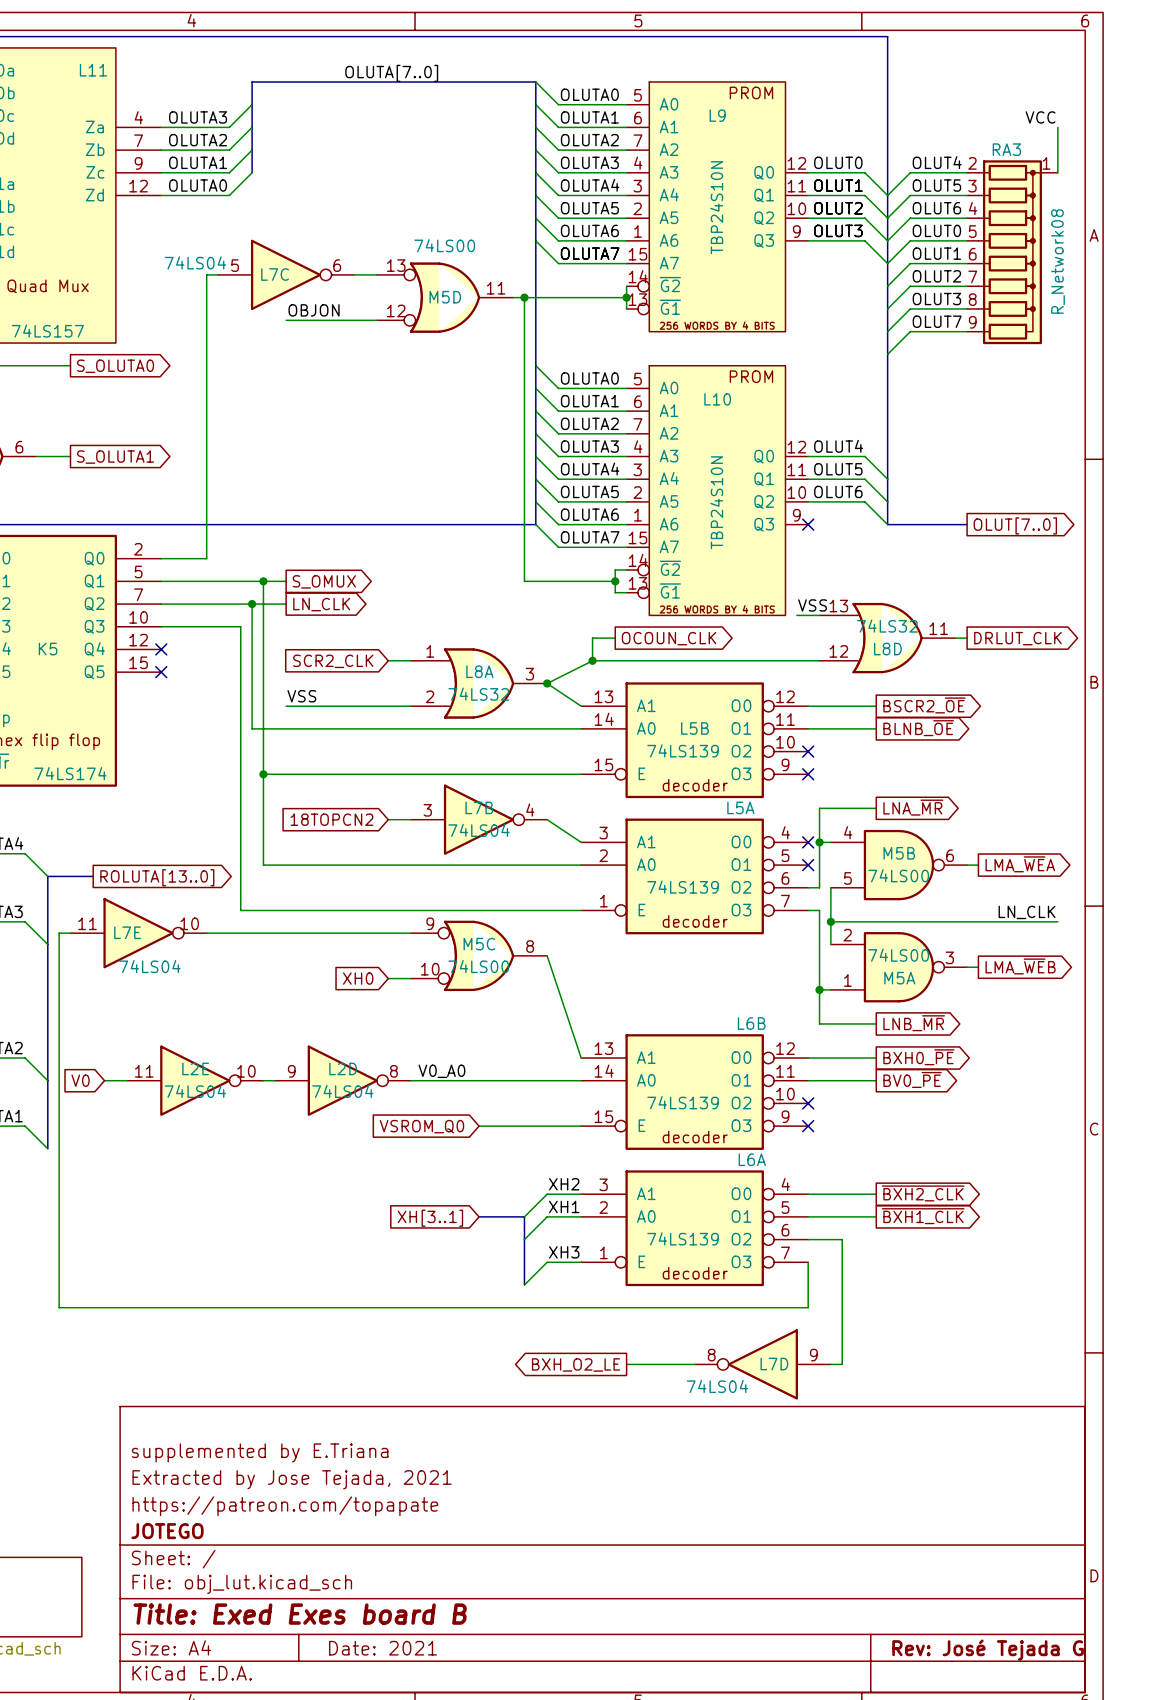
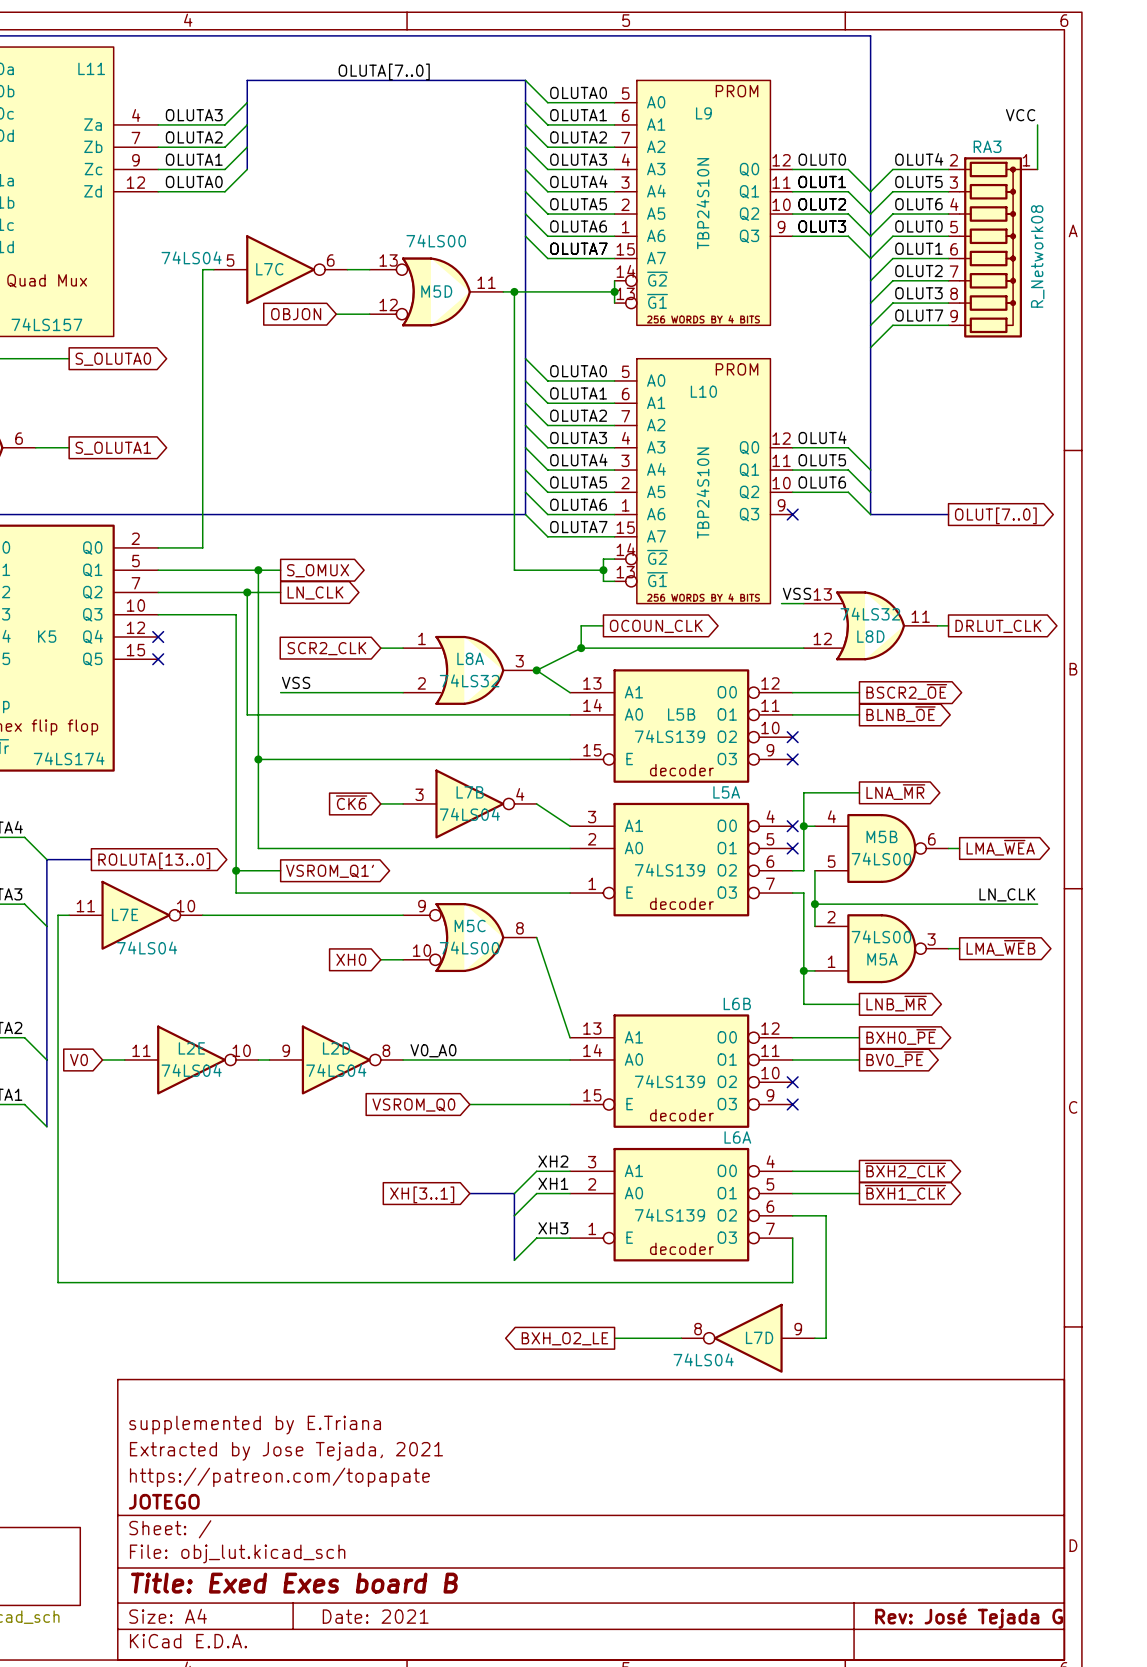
label: OBJON (314, 310) -> none
wire: (286, 320) (342, 320) -> none
global label: none -> OBJON (296, 314)
global label: 18TOPCN2 (331, 819) -> ~{CK6} (351, 802)
wire: none -> (236, 870) (280, 870)
junction: none -> (236, 870)
global label: none -> VSROM_Q1' (330, 871)

